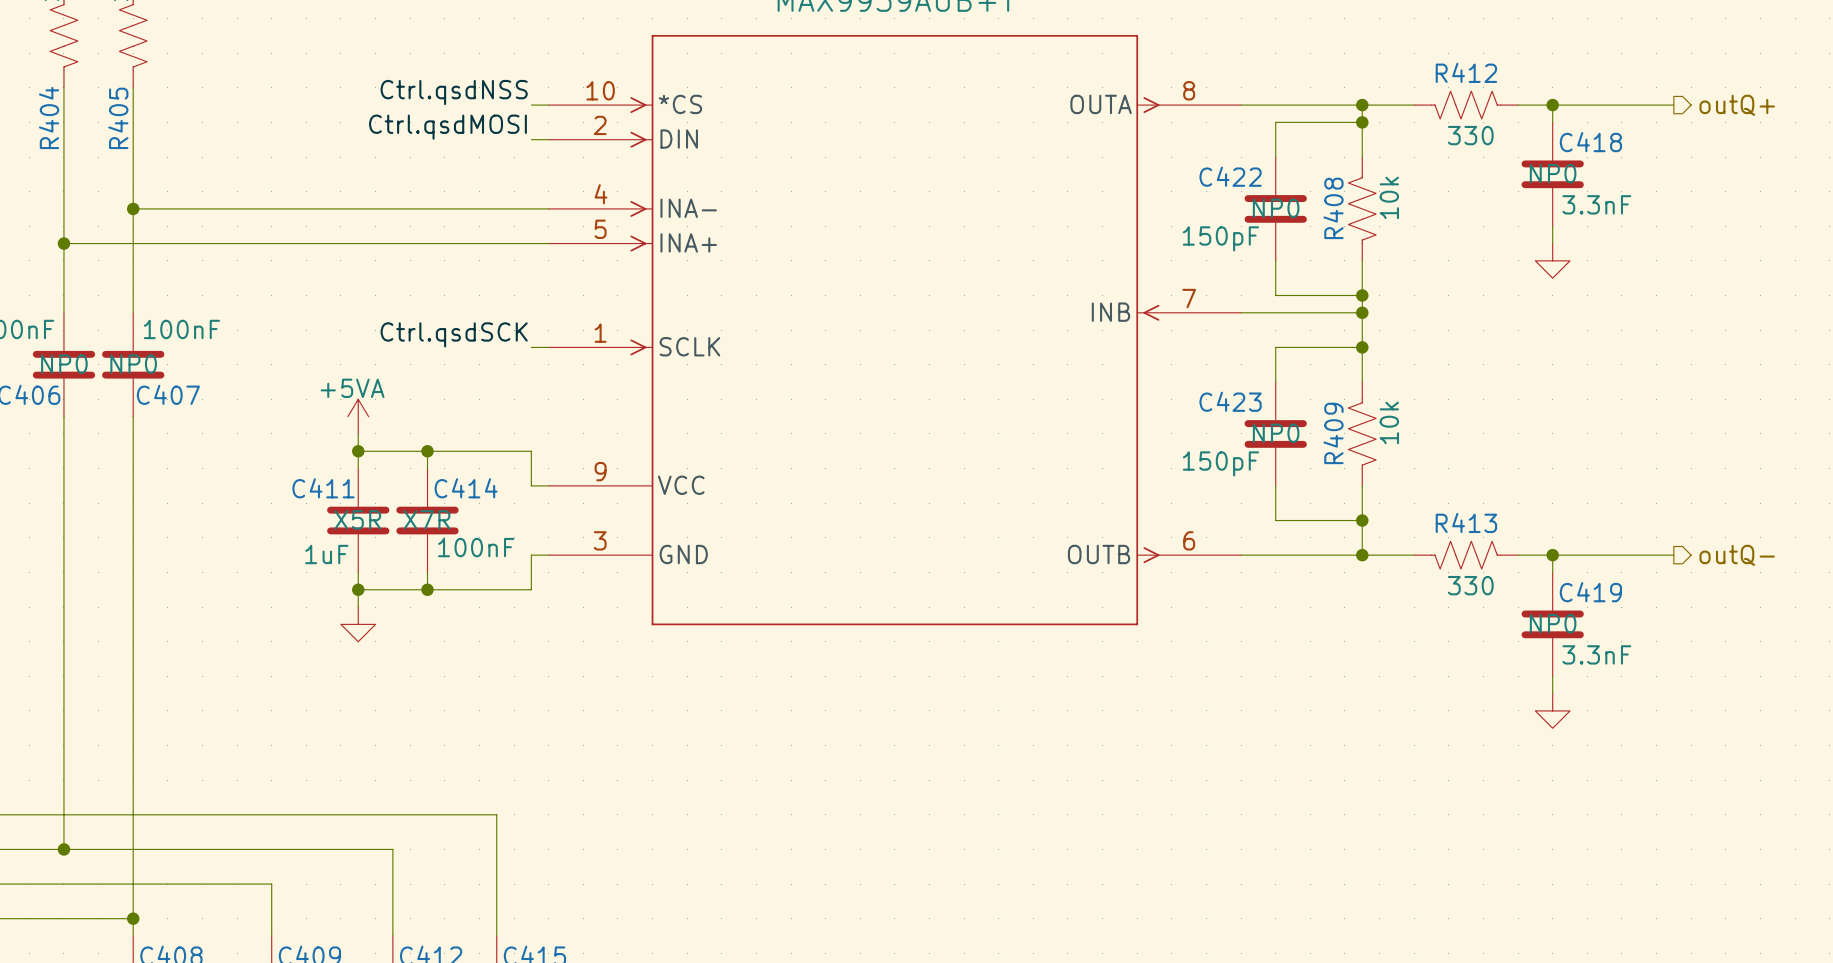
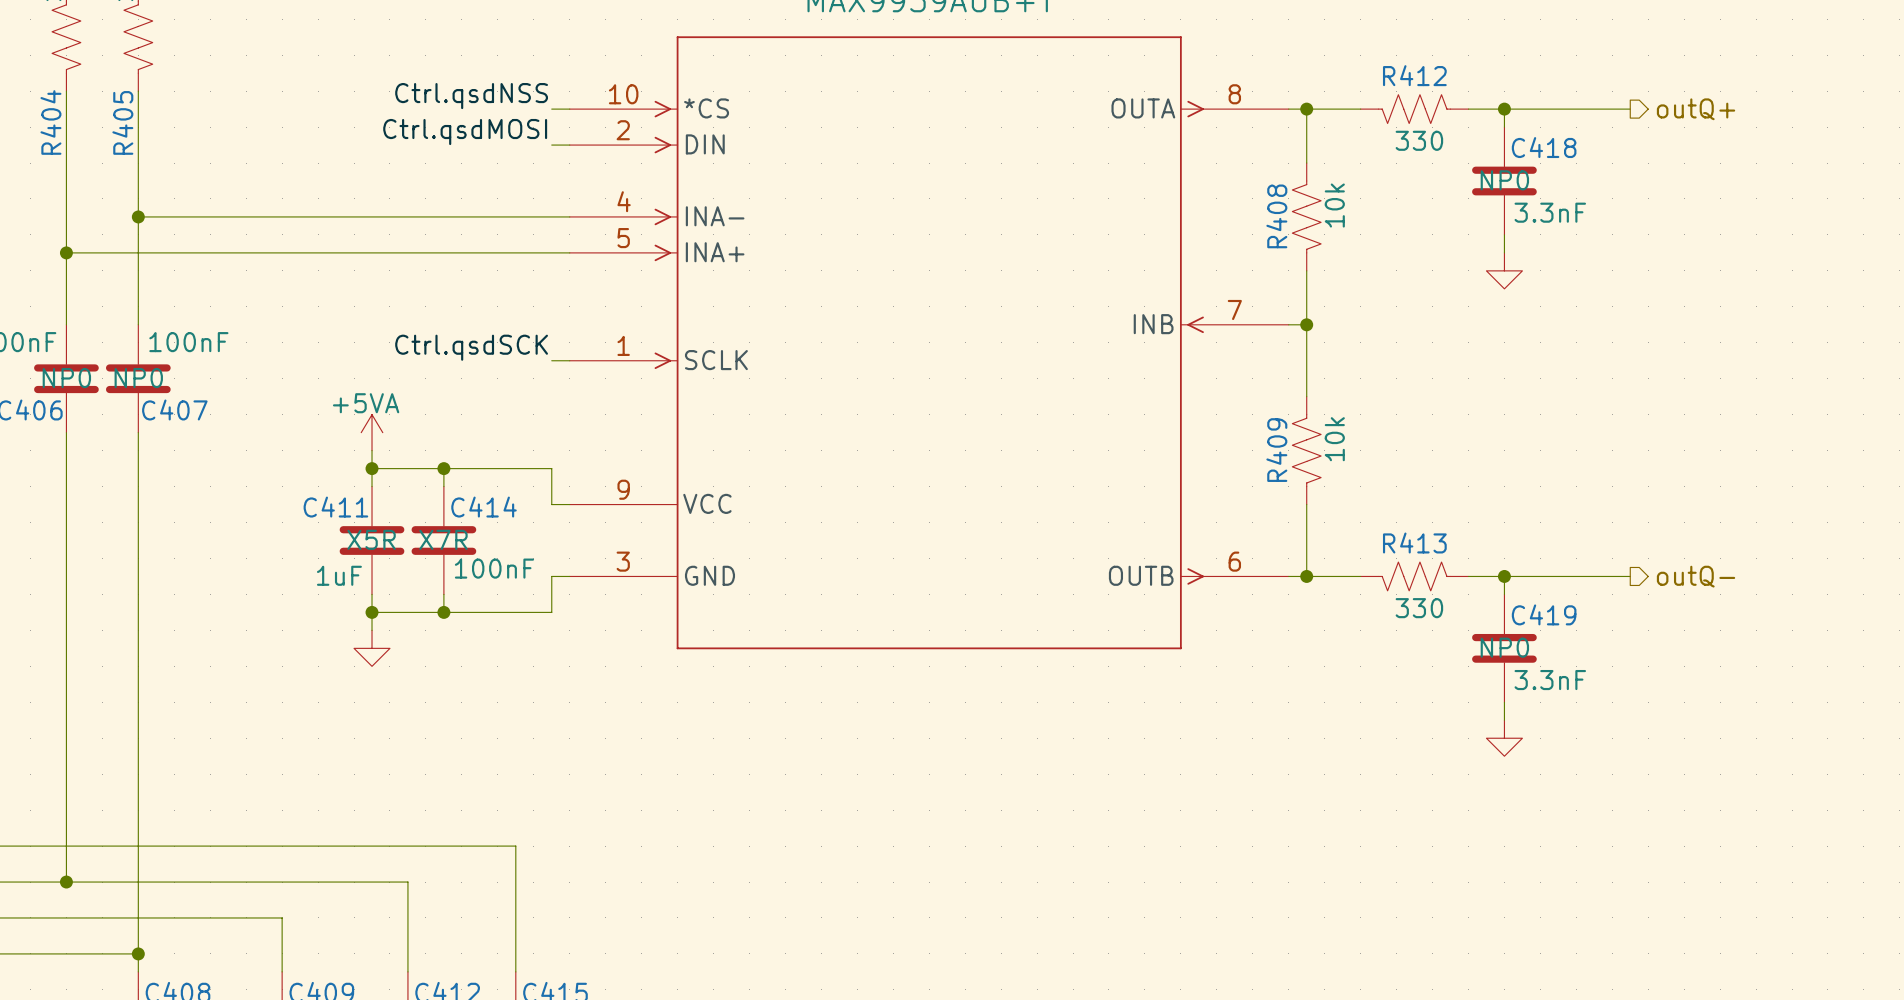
junction: none -> (1306, 109)
wire: (1310, 105) (1414, 105) -> (1576, 109) (1468, 109)
wire: (1362, 105) (1362, 157) -> (1306, 109) (1306, 163)
junction: (1362, 105) -> none
junction: none -> (1504, 109)
R412 position: (1466, 105) -> (1414, 109)
wire: (1552, 105) (1552, 122) -> (1504, 109) (1504, 127)
junction: (1552, 105) -> none
wire: (1570, 105) (1673, 105) -> none
hierarchical label position: outQ+ (1737, 105) -> outQ+ (1696, 109)
wire: (1362, 122) (1275, 122) (1275, 157) -> none
junction: (1362, 122) -> none
C418 position: (1552, 174) -> (1504, 181)
C422: 150pF (1275, 208) -> none
R408 position: (1362, 208) -> (1306, 216)
wire: (1552, 226) (1552, 243) -> (1504, 234) (1504, 252)
wire: (1275, 260) (1275, 295) (1362, 295) -> none
wire: (1362, 260) (1362, 382) -> (1306, 270) (1306, 396)
power symbol position: (1552, 260) -> (1504, 270)
junction: (1362, 295) -> none
wire: (1258, 312) (1362, 312) -> none
junction: none -> (1306, 324)
junction: (1362, 312) -> none
wire: (1362, 347) (1275, 347) (1275, 382) -> none
junction: (1362, 347) -> none
C423: 150pF (1275, 433) -> none
R409 position: (1362, 433) -> (1306, 450)
wire: (1275, 485) (1275, 520) (1362, 520) -> none
wire: (1362, 485) (1362, 555) -> (1306, 504) (1306, 576)
junction: (1362, 520) -> none
junction: none -> (1306, 576)
wire: (1310, 555) (1414, 555) -> (1576, 576) (1468, 576)
junction: (1362, 555) -> none
junction: none -> (1504, 576)
R413 position: (1466, 555) -> (1414, 576)
wire: (1552, 555) (1552, 572) -> (1504, 576) (1504, 594)
junction: (1552, 555) -> none
wire: (1570, 555) (1673, 555) -> none
hierarchical label position: outQ- (1737, 555) -> outQ- (1696, 576)
C419 position: (1552, 624) -> (1504, 648)
wire: (1552, 676) (1552, 693) -> (1504, 702) (1504, 720)
power symbol position: (1552, 710) -> (1504, 738)

